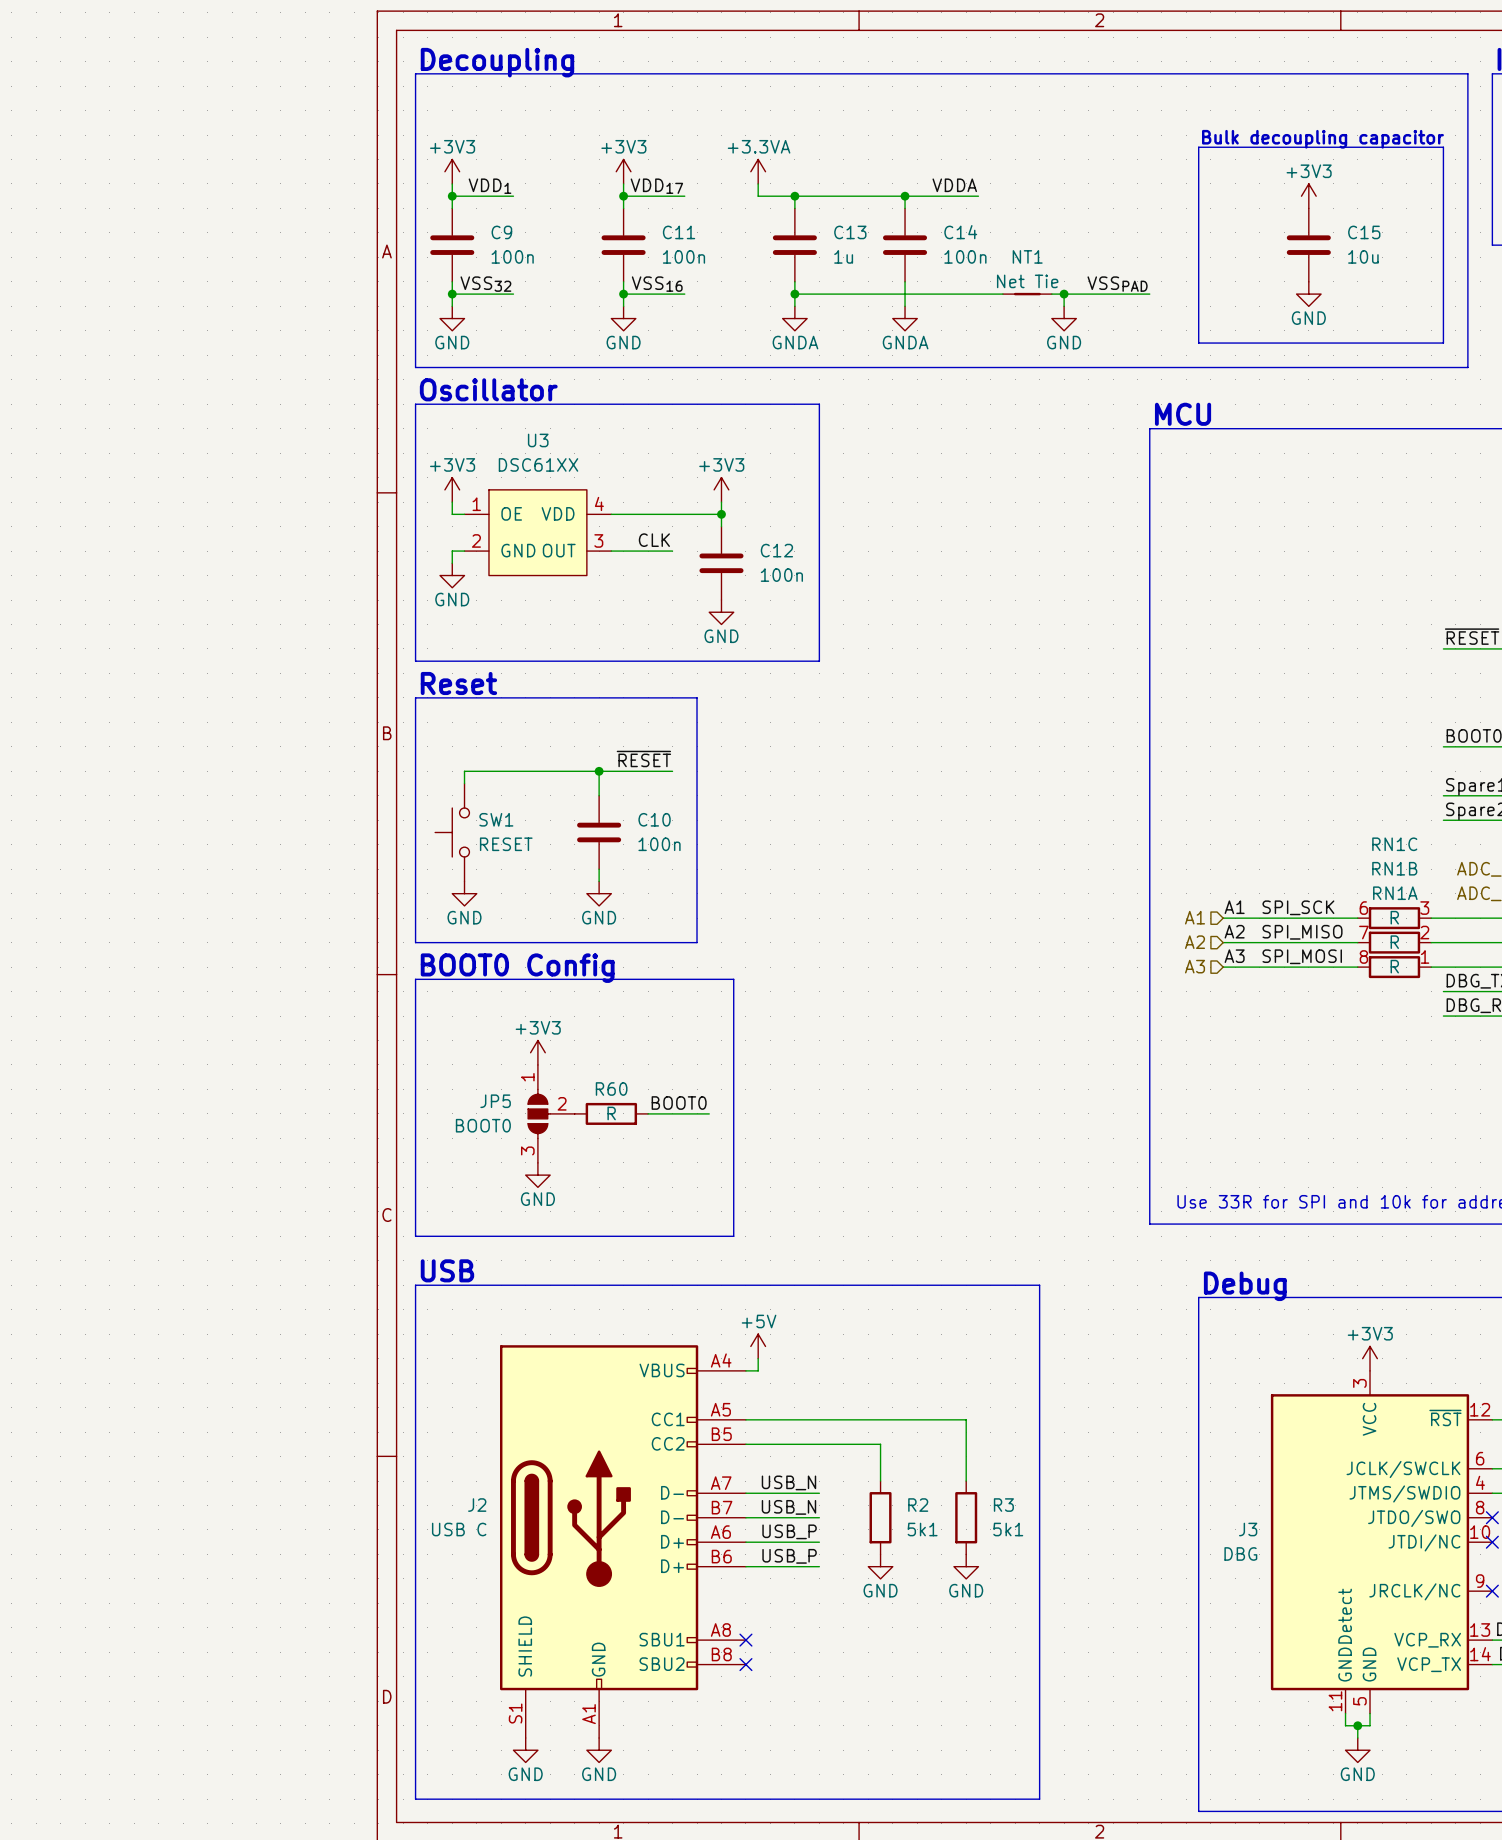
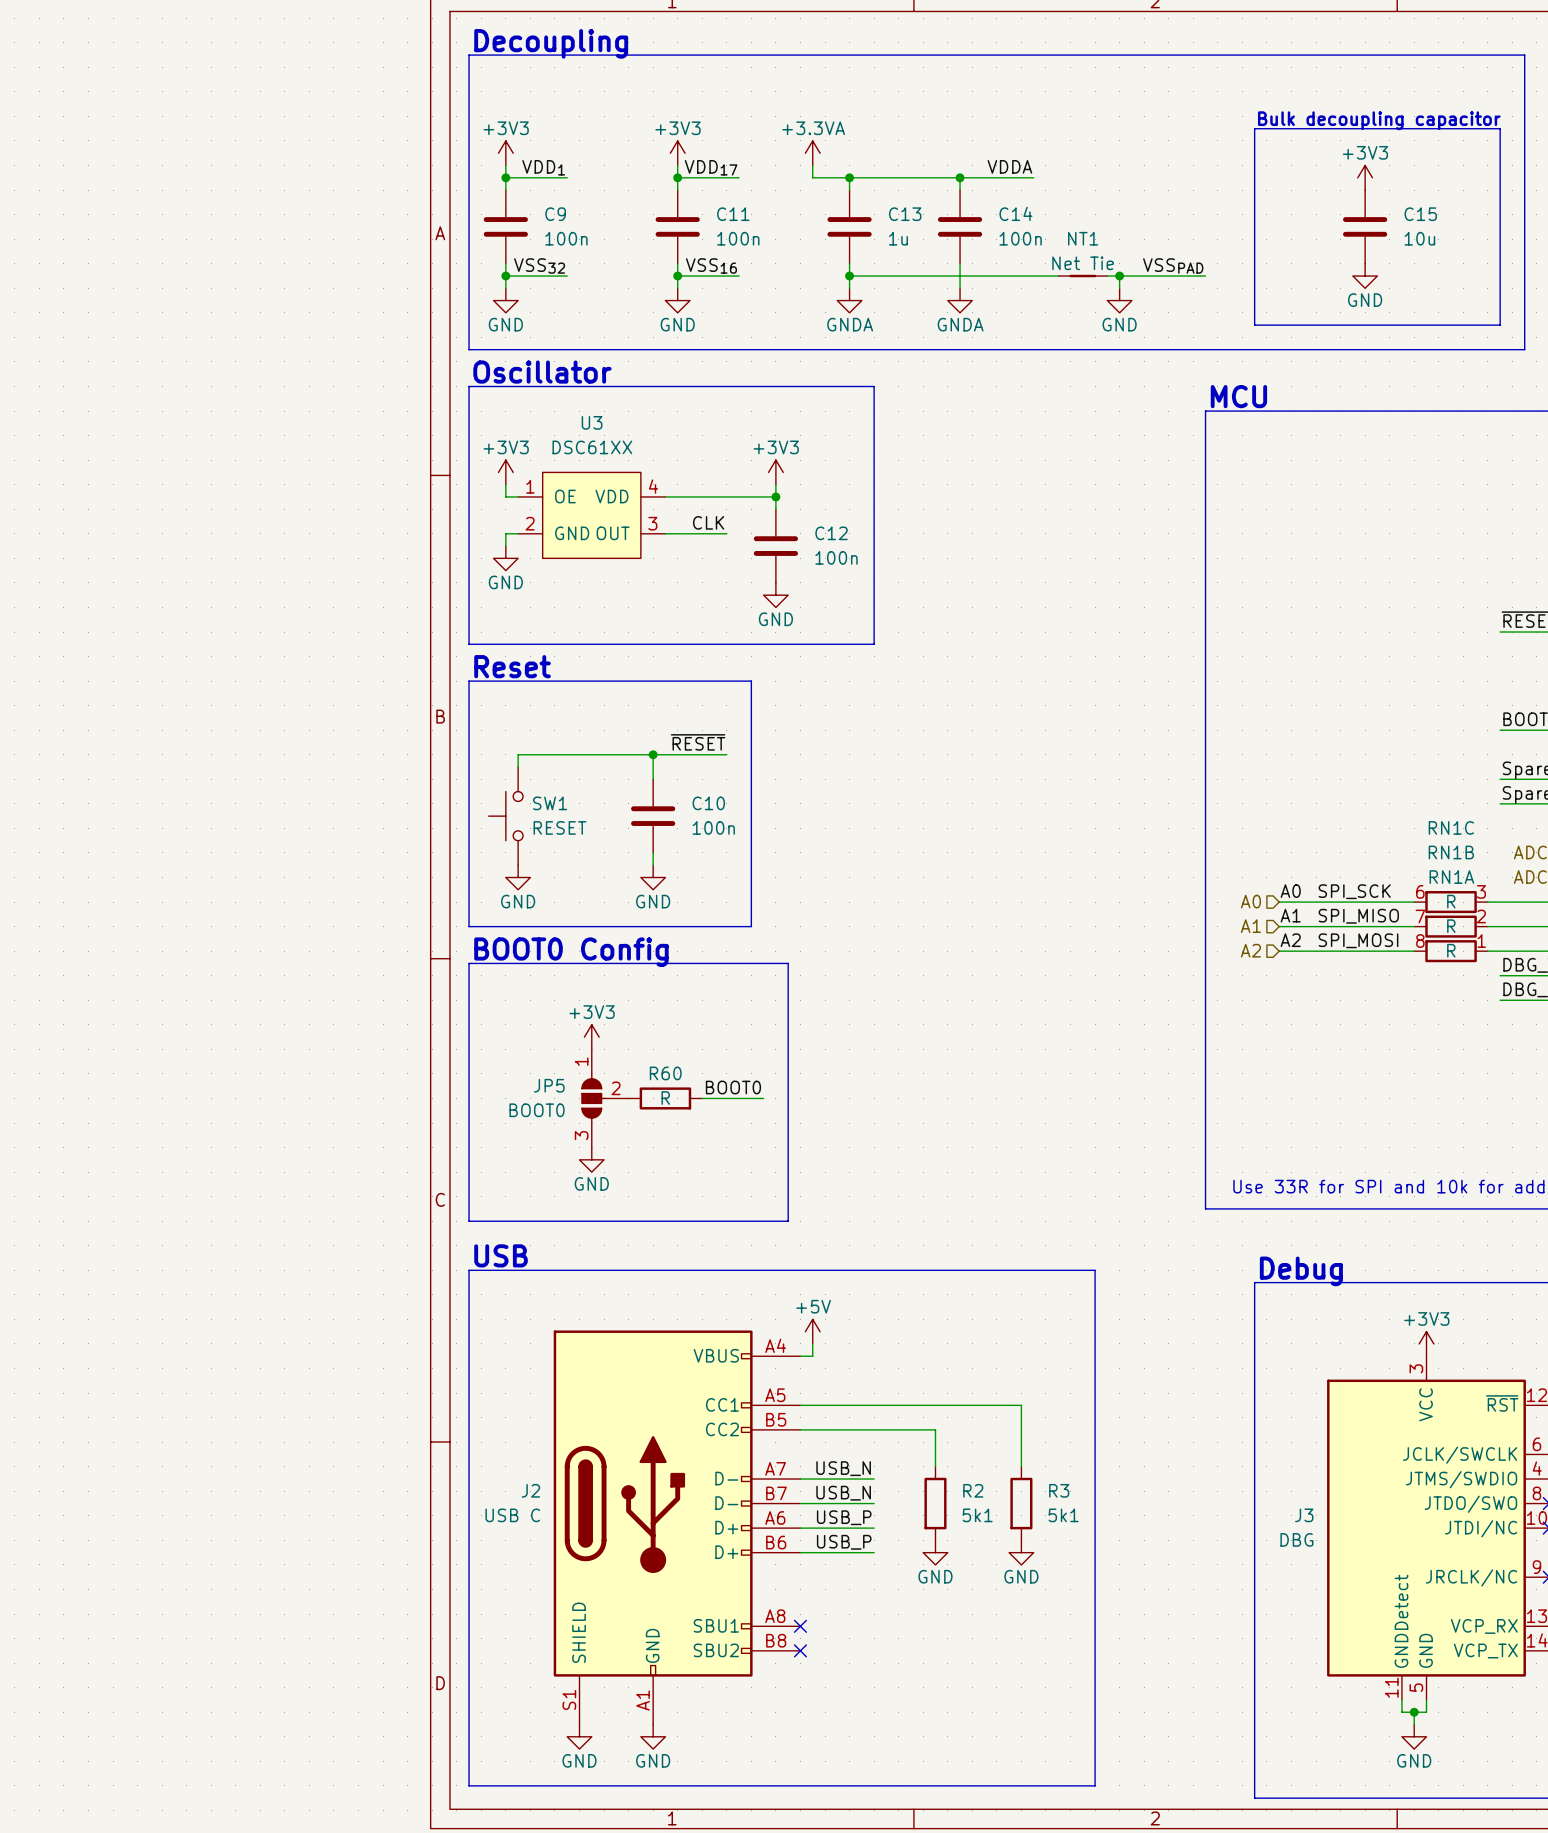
label: A1 (1234, 907) -> A0 (1290, 891)
hierarchical label: A1 (1195, 917) -> A0 (1250, 901)
label: A2 (1234, 931) -> A1 (1290, 915)
hierarchical label: A2 (1195, 942) -> A1 (1250, 926)
label: A3 (1234, 956) -> A2 (1290, 940)
hierarchical label: A3 (1195, 966) -> A2 (1250, 950)

